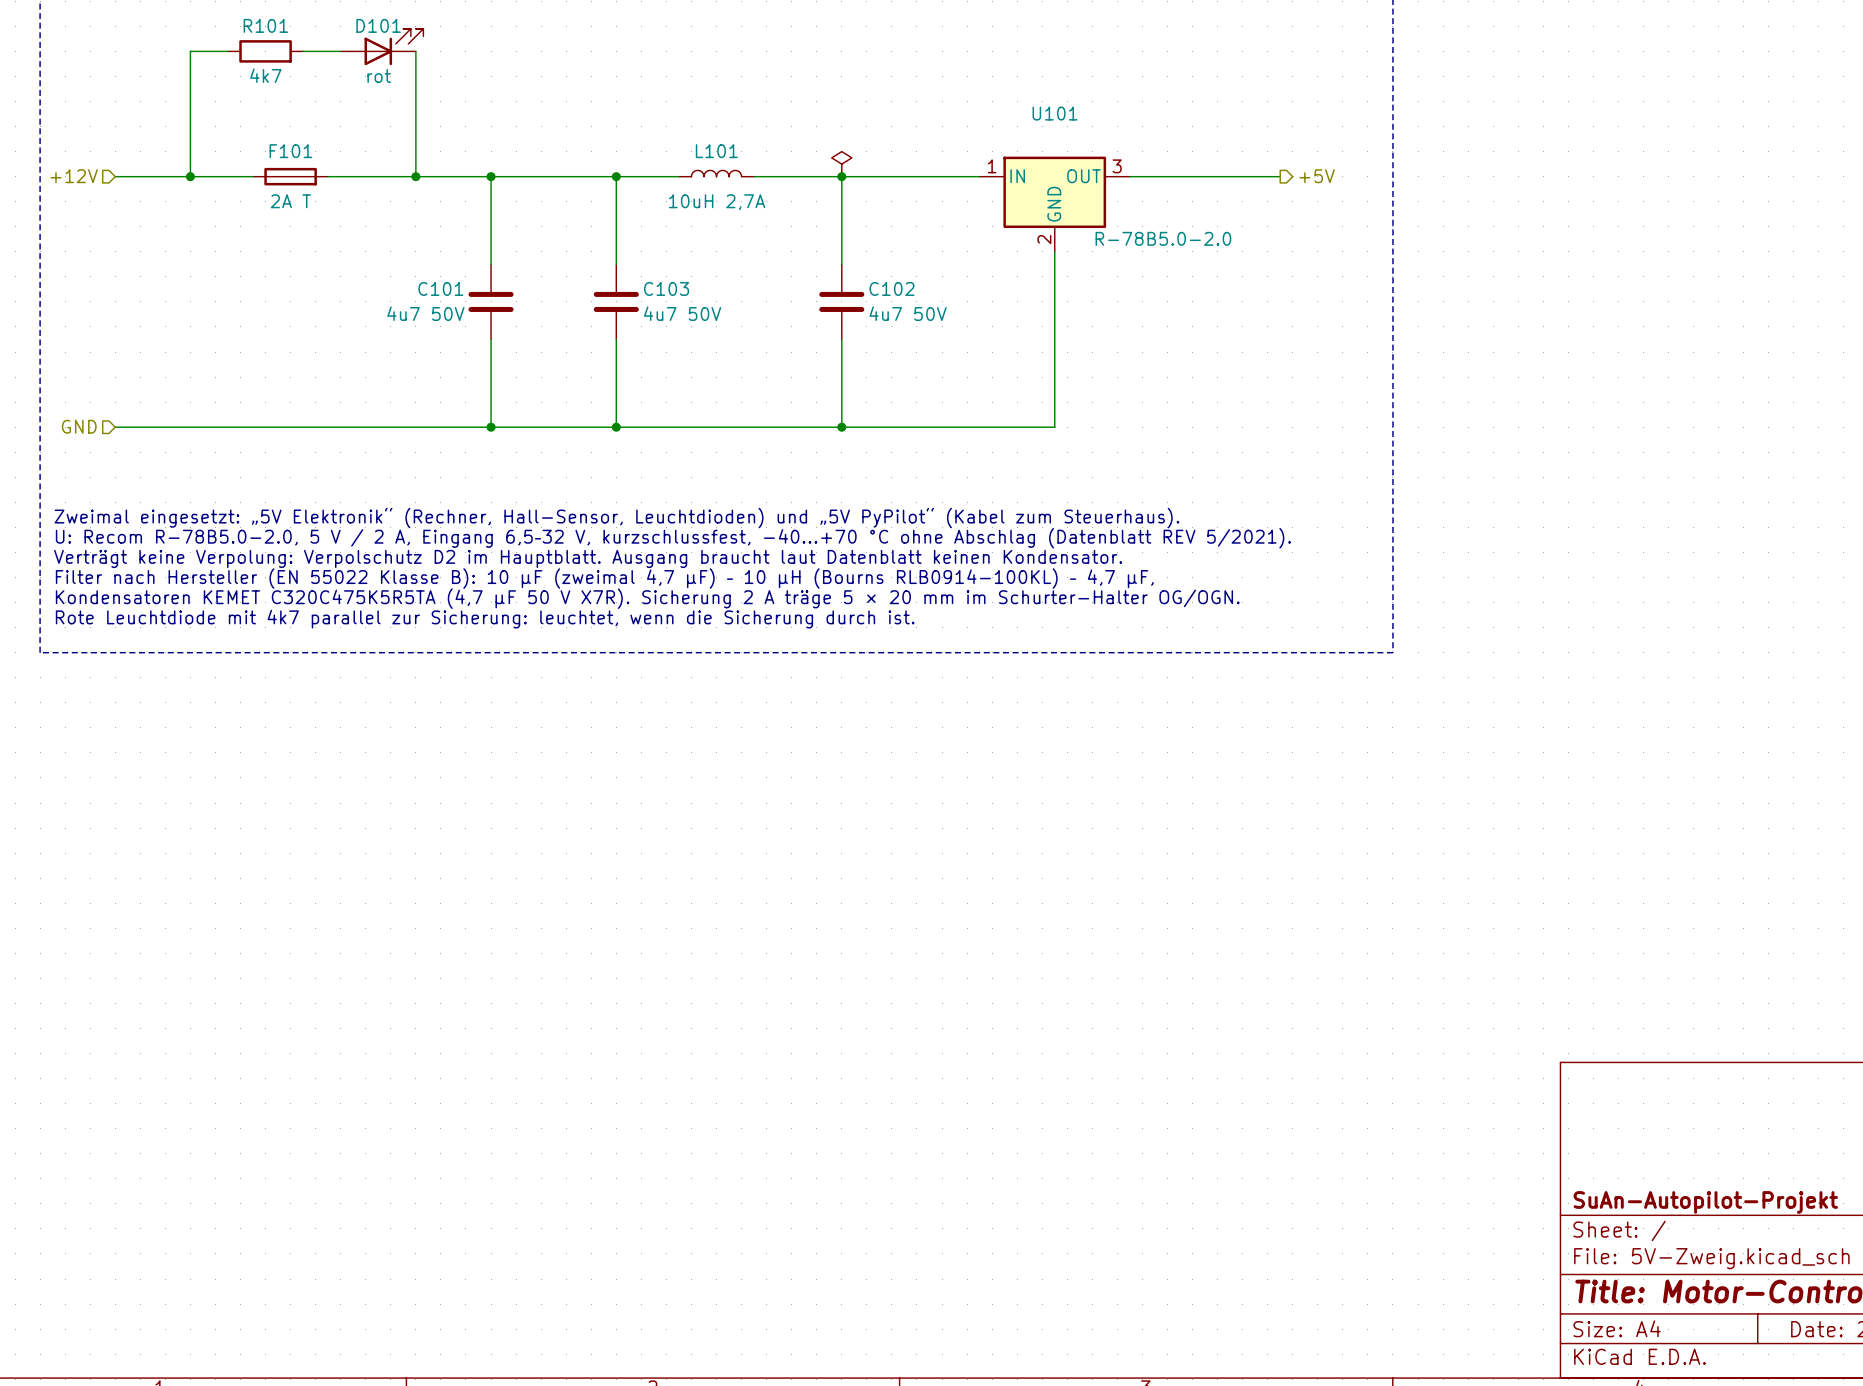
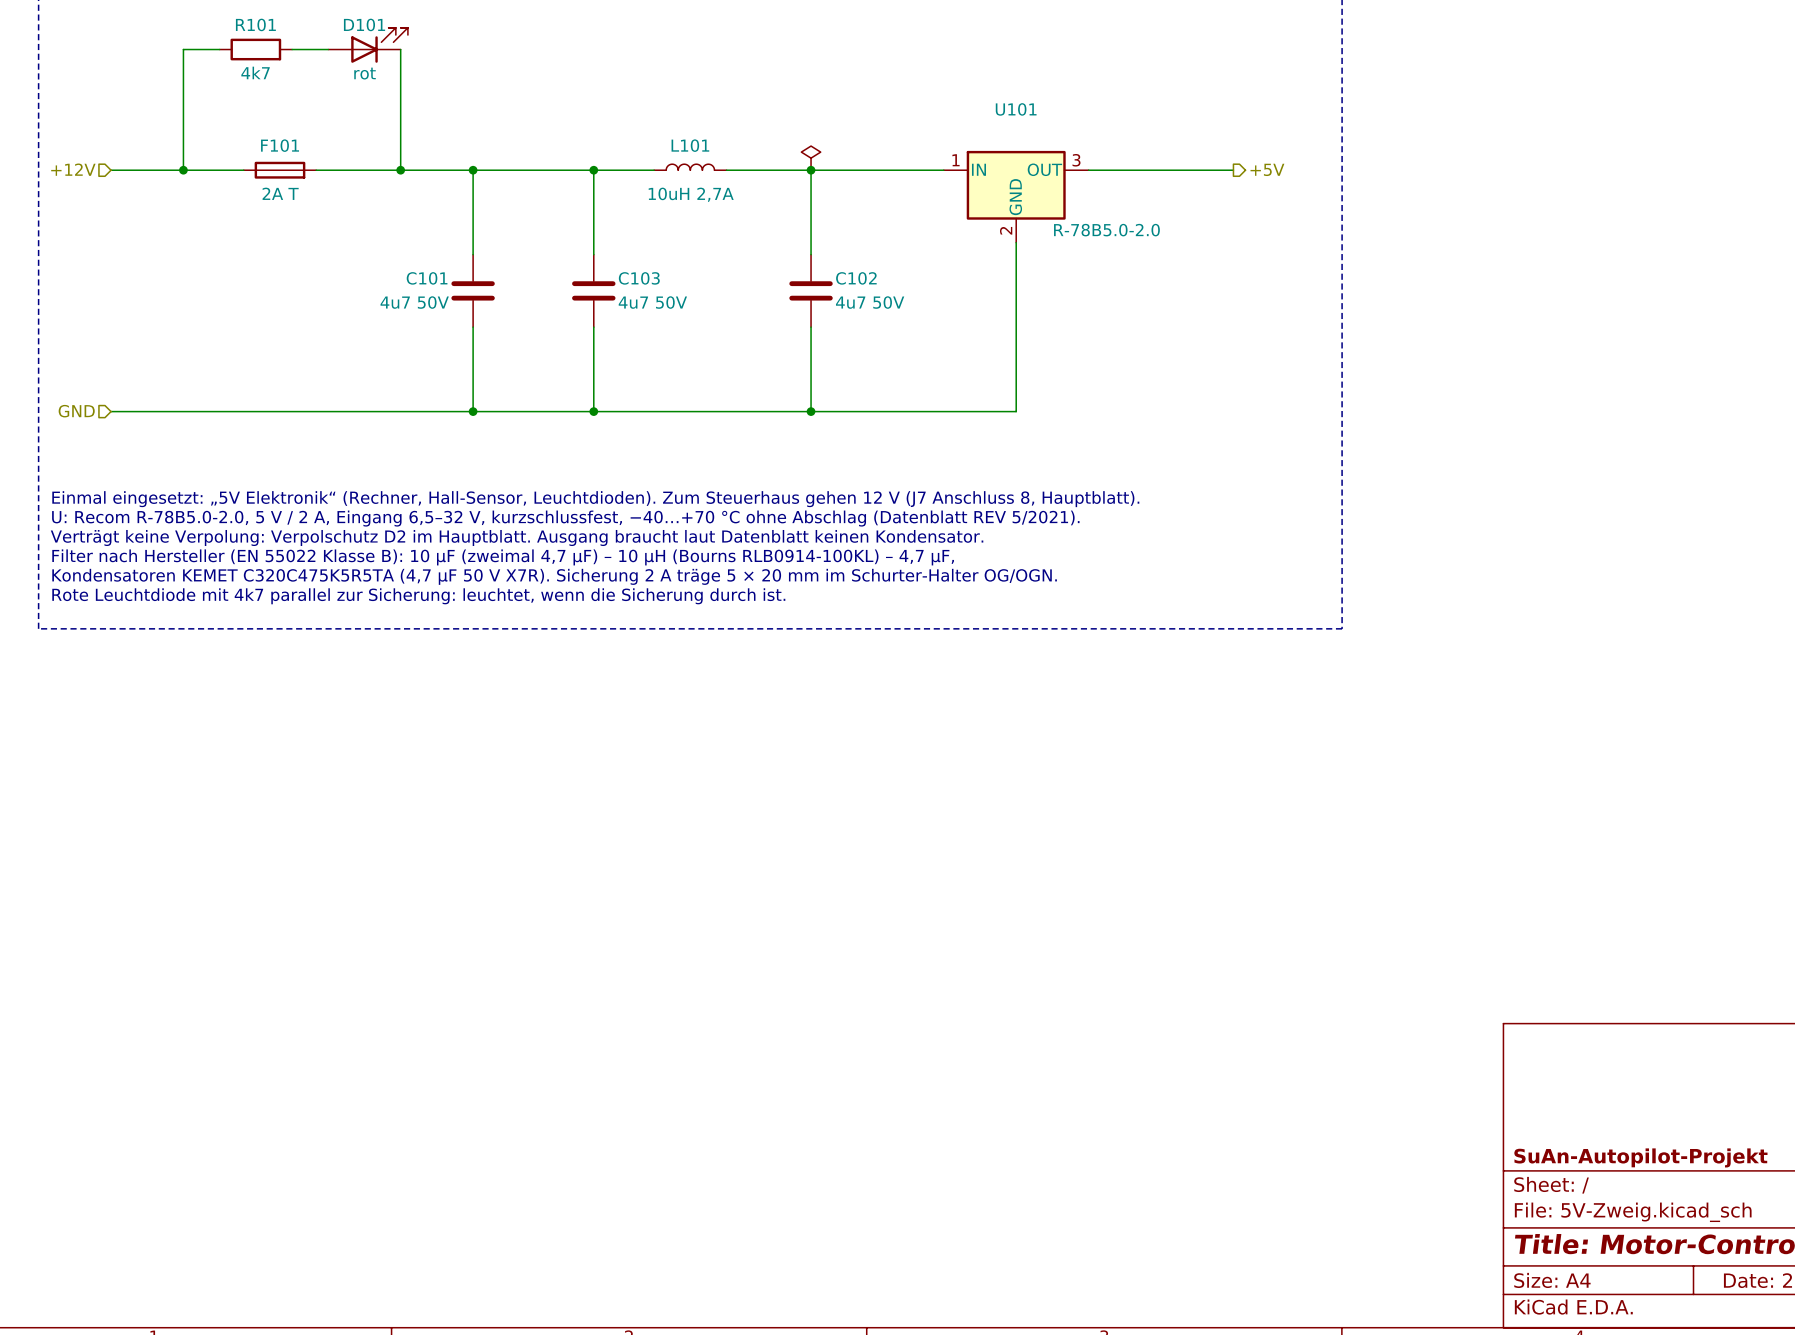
text: Zweimal eingesetzt: „5V Elektronik“ (Rechner, Hall-Sensor, Leuchtdioden) und „5V PyPilot“ (Kabel zum Steuerhaus). (616, 518) -> Einmal eingesetzt: „5V Elektronik“ (Rechner, Hall-Sensor, Leuchtdioden). Zum Steuerhaus gehen 12 V (J7 Anschluss 8, Hauptblatt). (595, 499)

